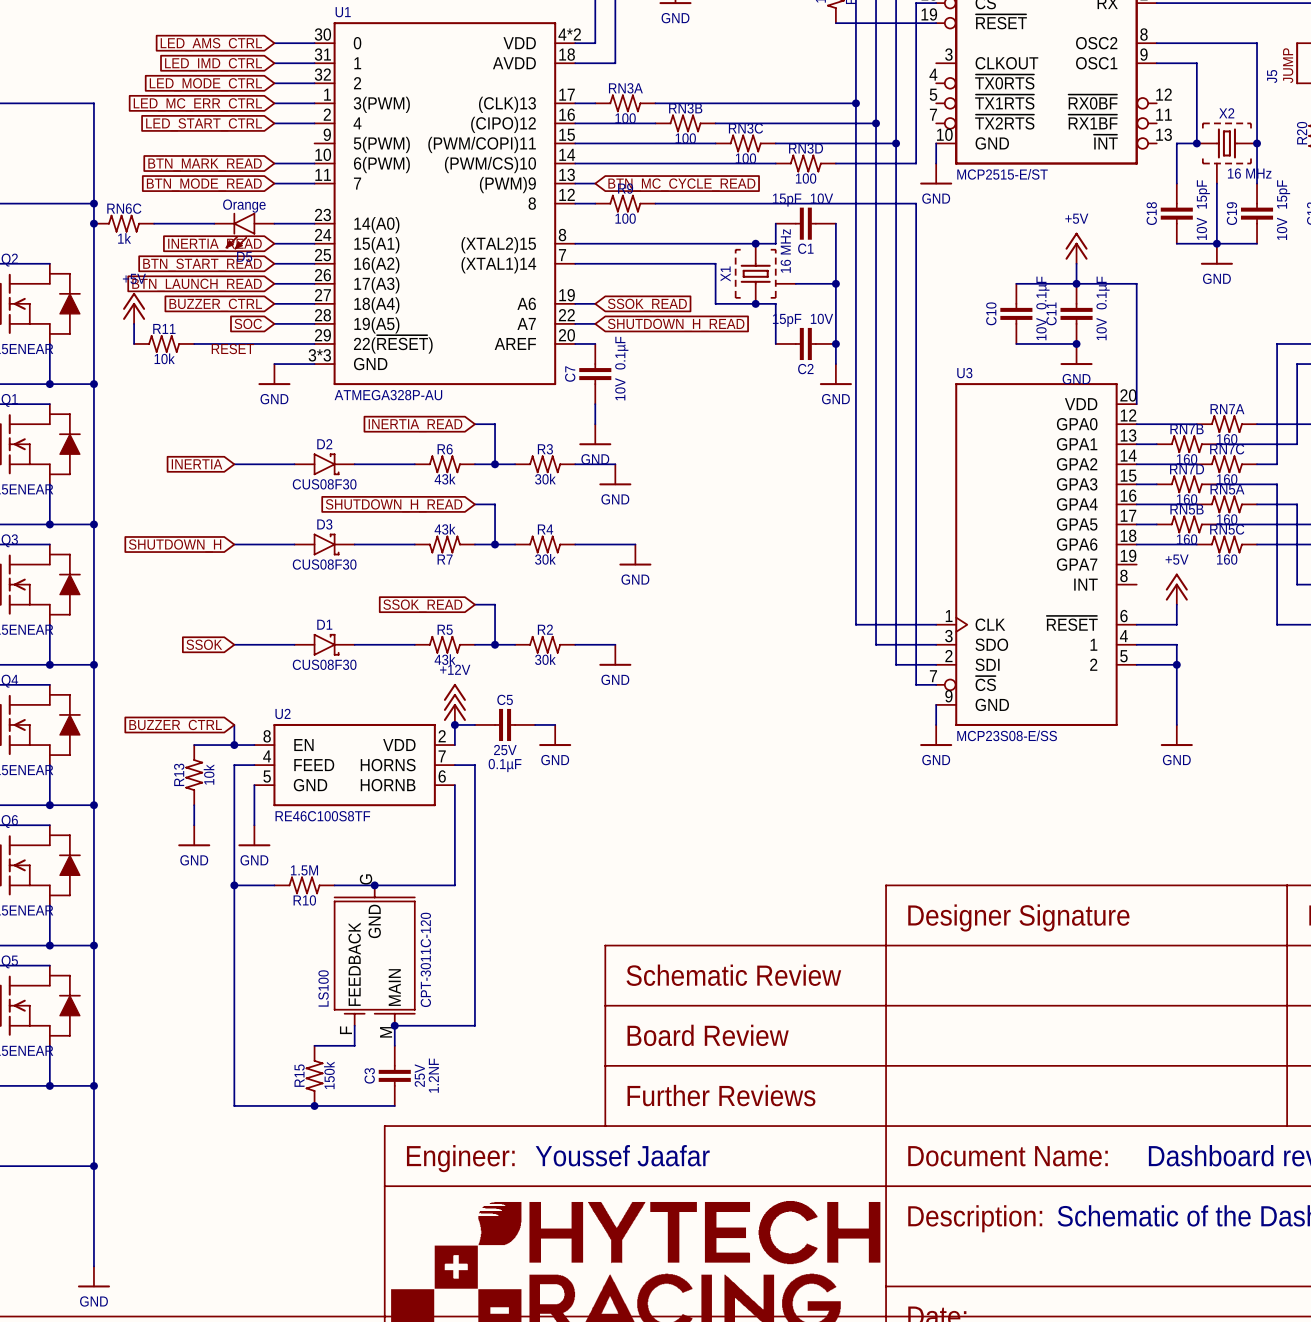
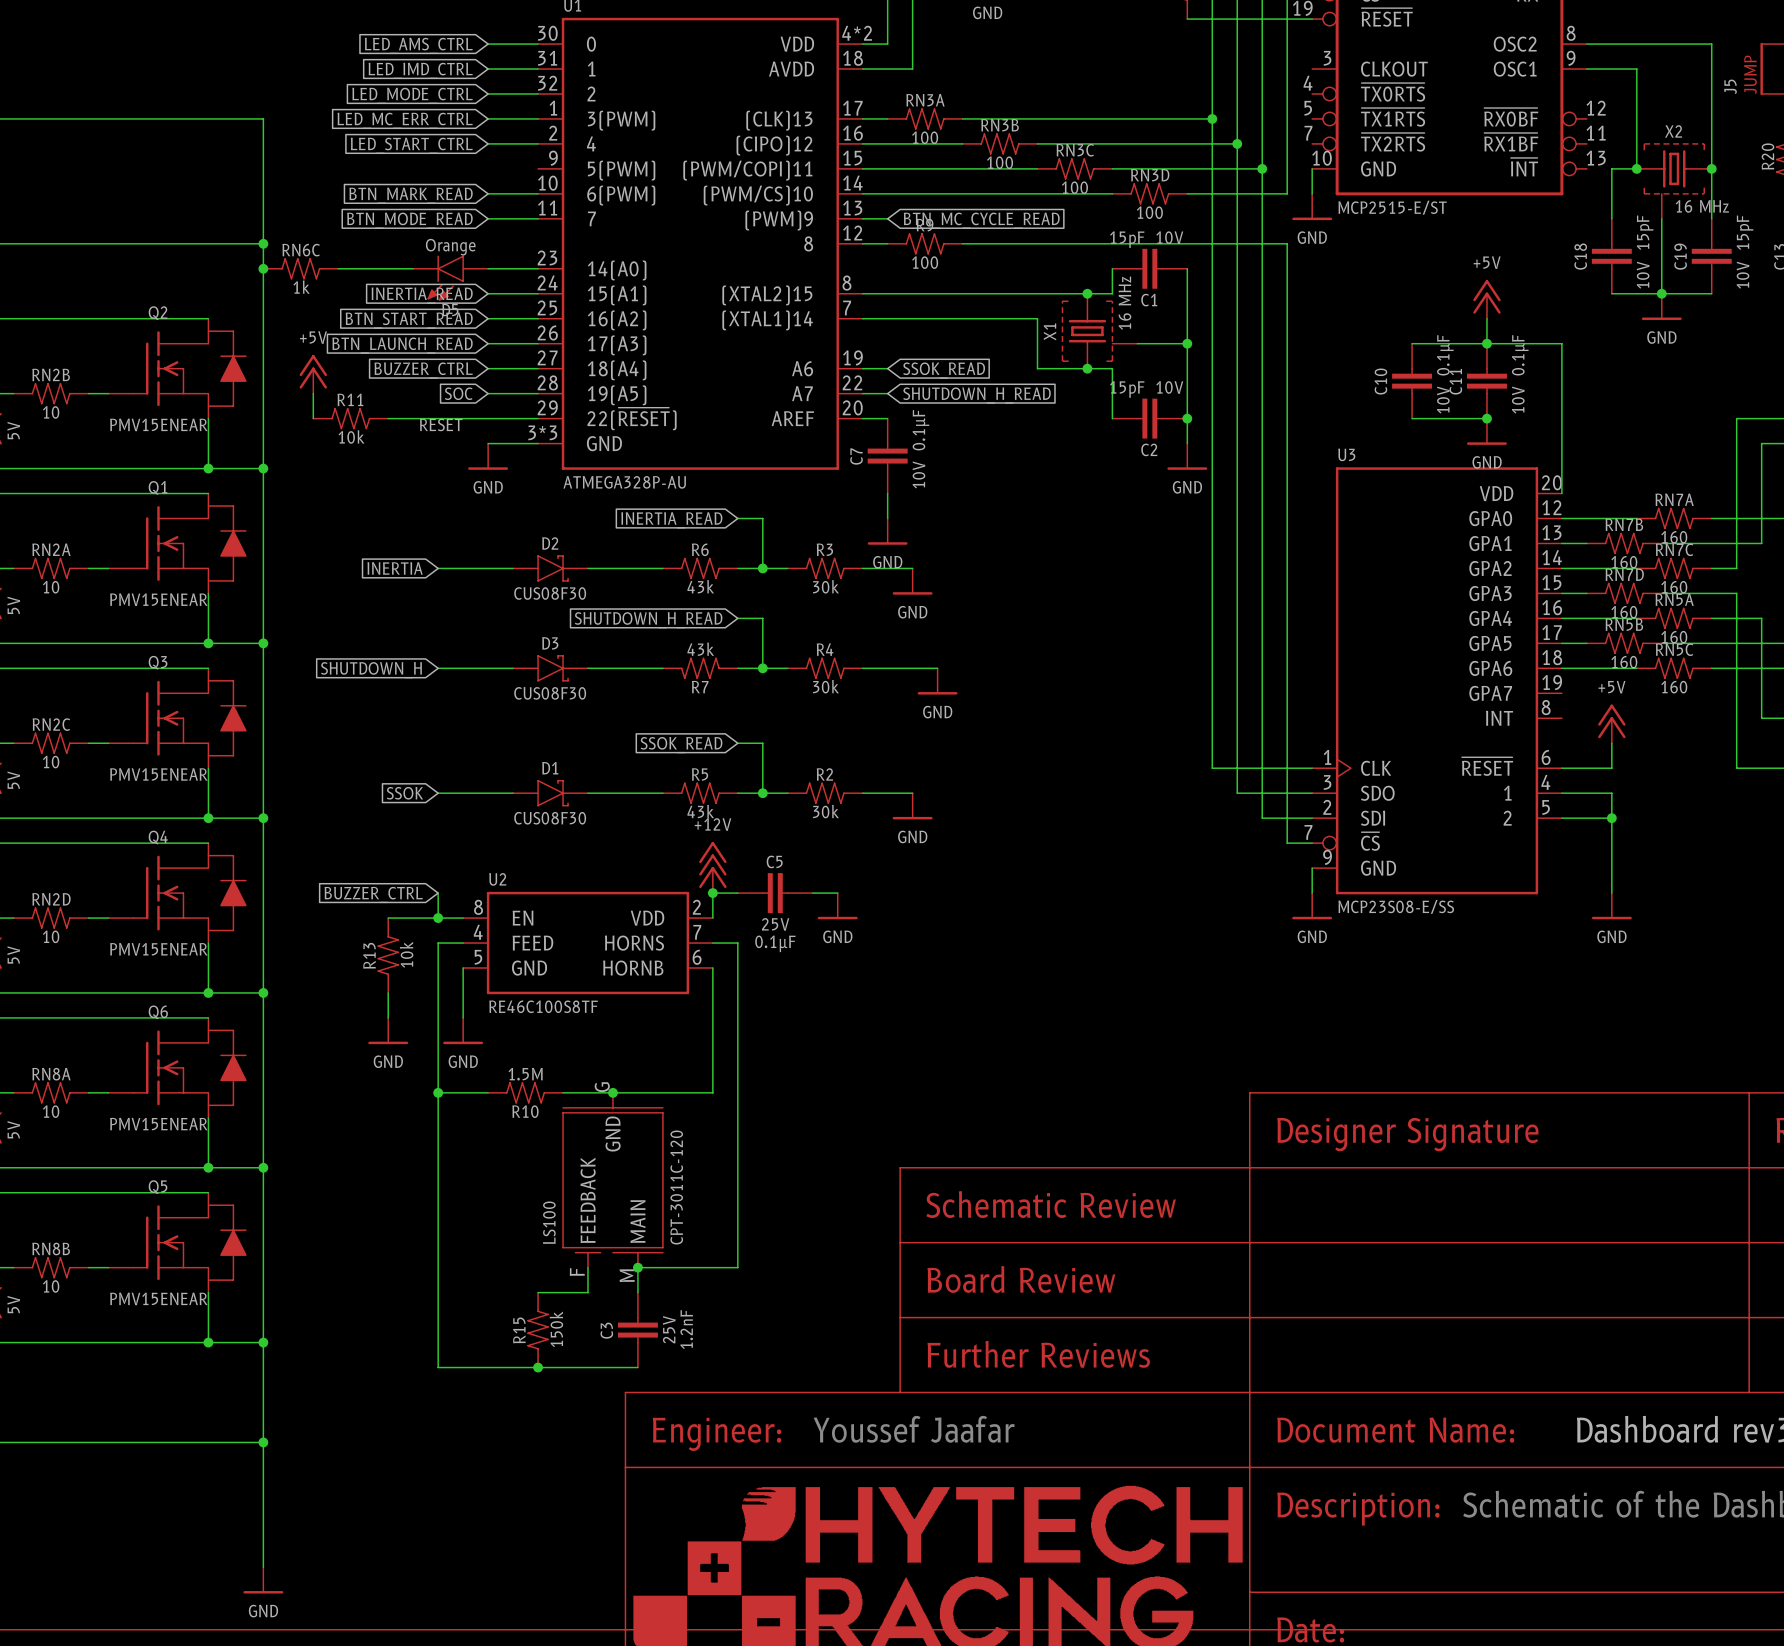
C3 text: 1.2NF (433, 1075) -> 1.2nF (686, 1329)

